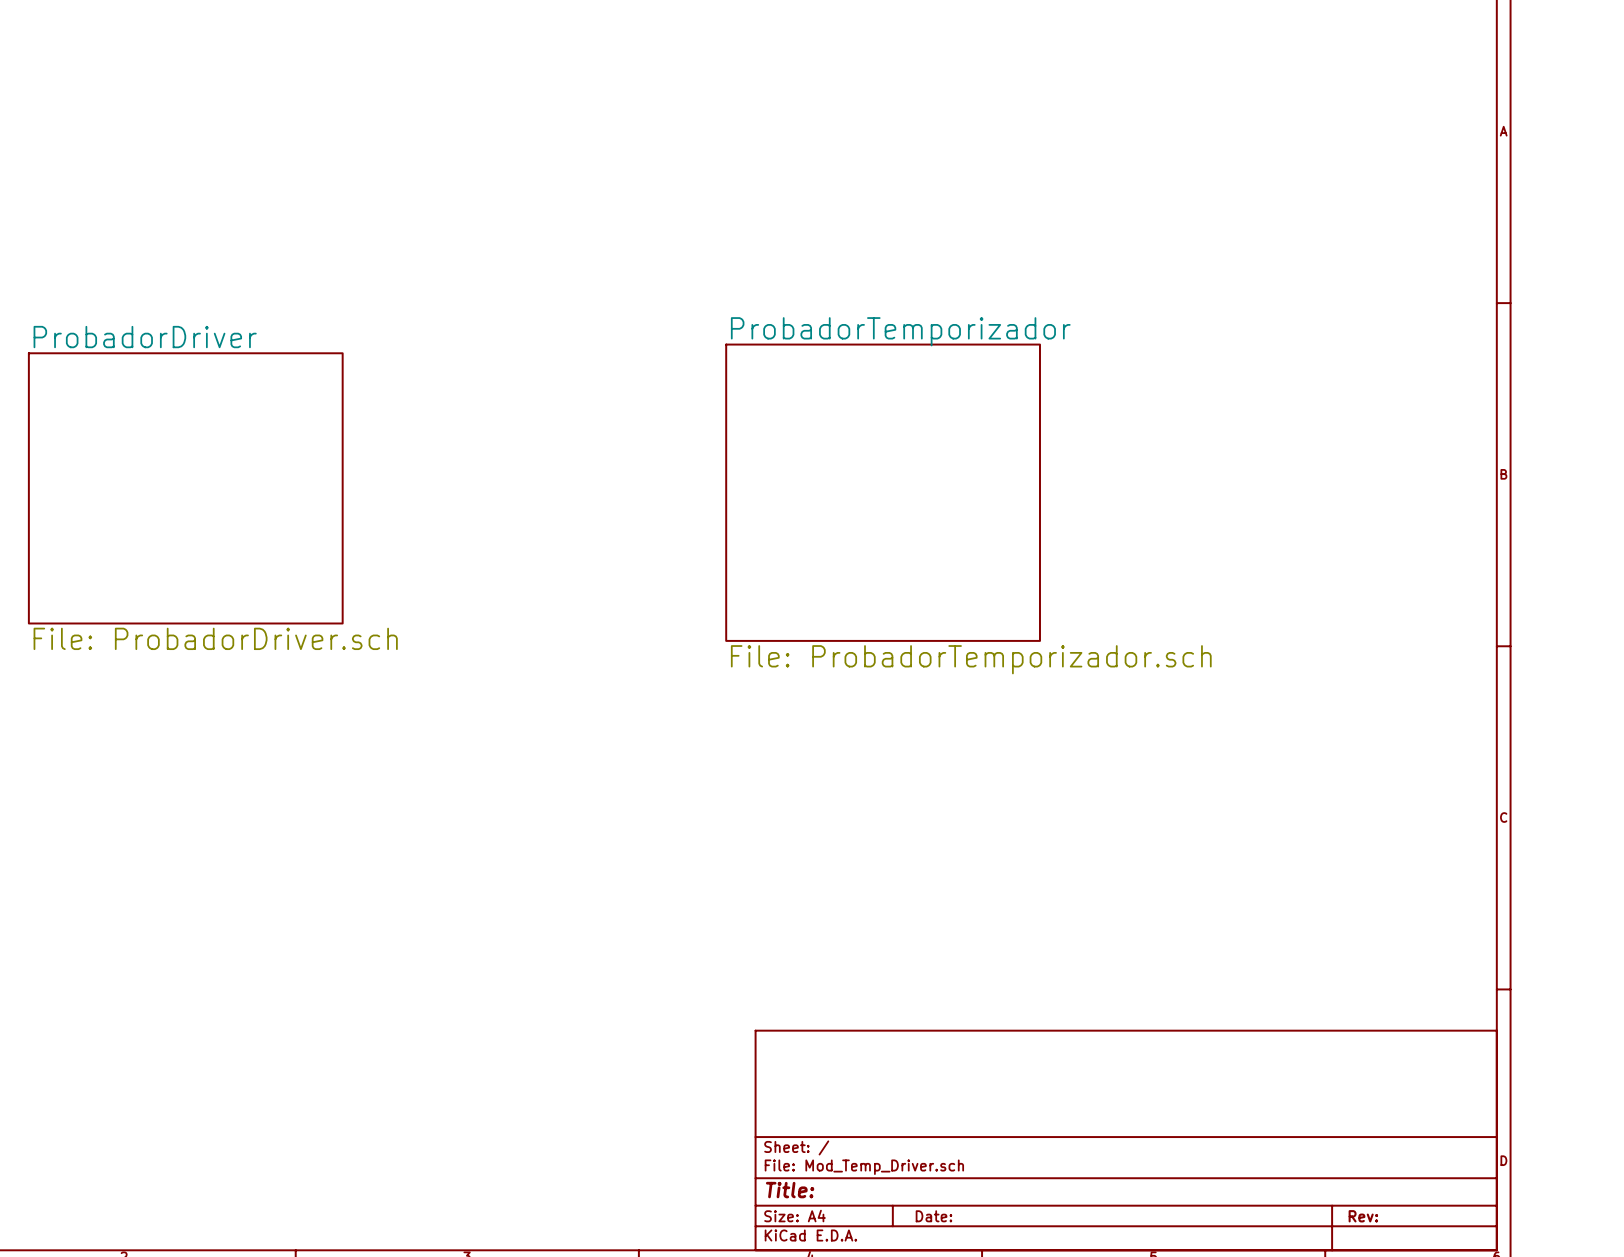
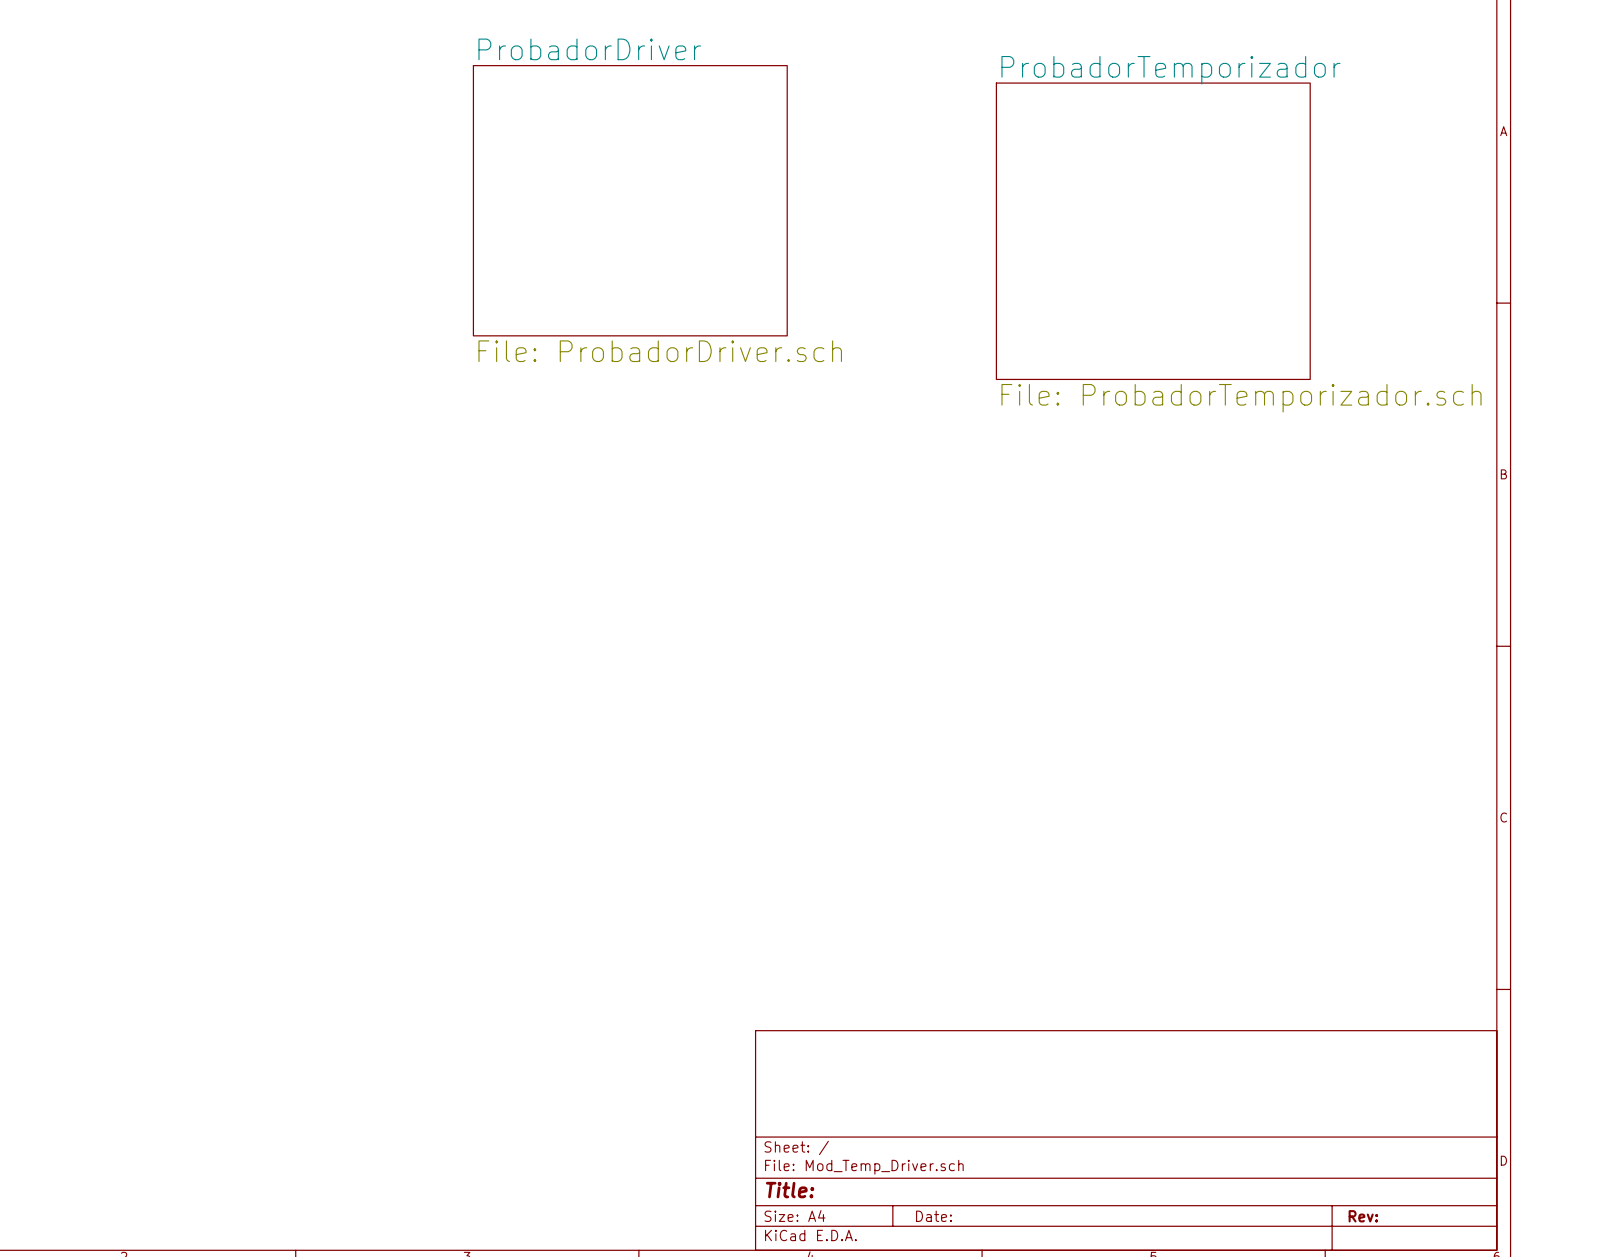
sheet ProbadorDriver: none -> File: ProbadorDriver.sch (630, 200)
sheet ProbadorTemporizador: none -> File: ProbadorTemporizador.sch (1153, 231)
sheet ProbadorDriver: File: ProbadorDriver.sch (185, 488) -> none
sheet ProbadorTemporizador: File: ProbadorTemporizador.sch (883, 492) -> none

